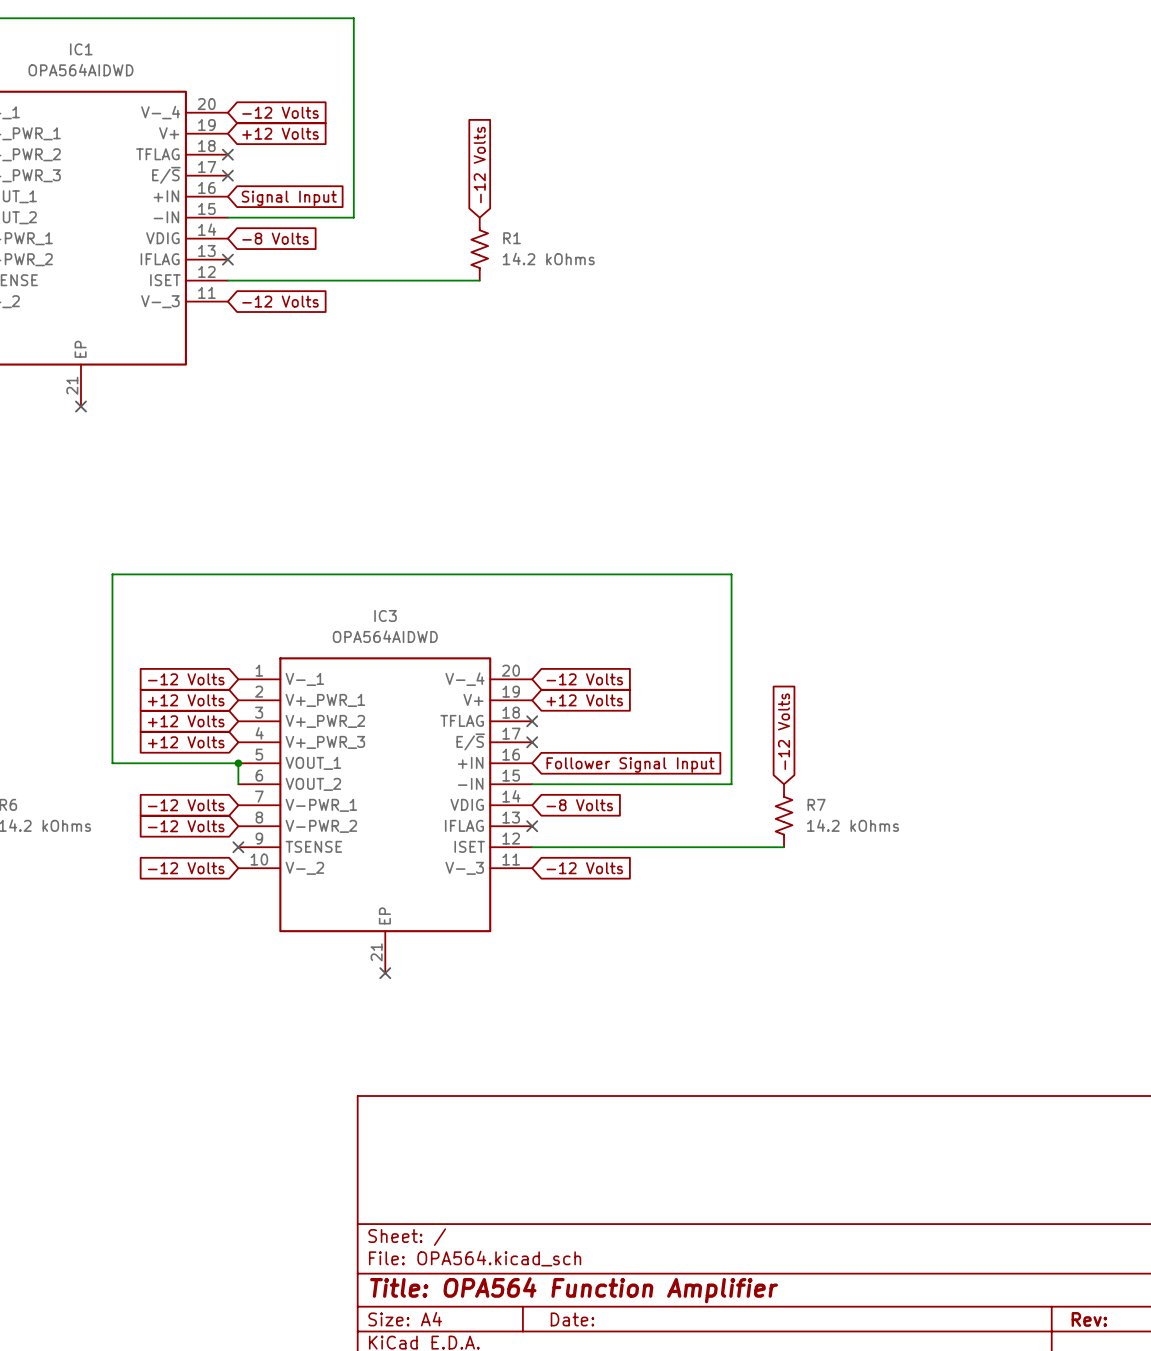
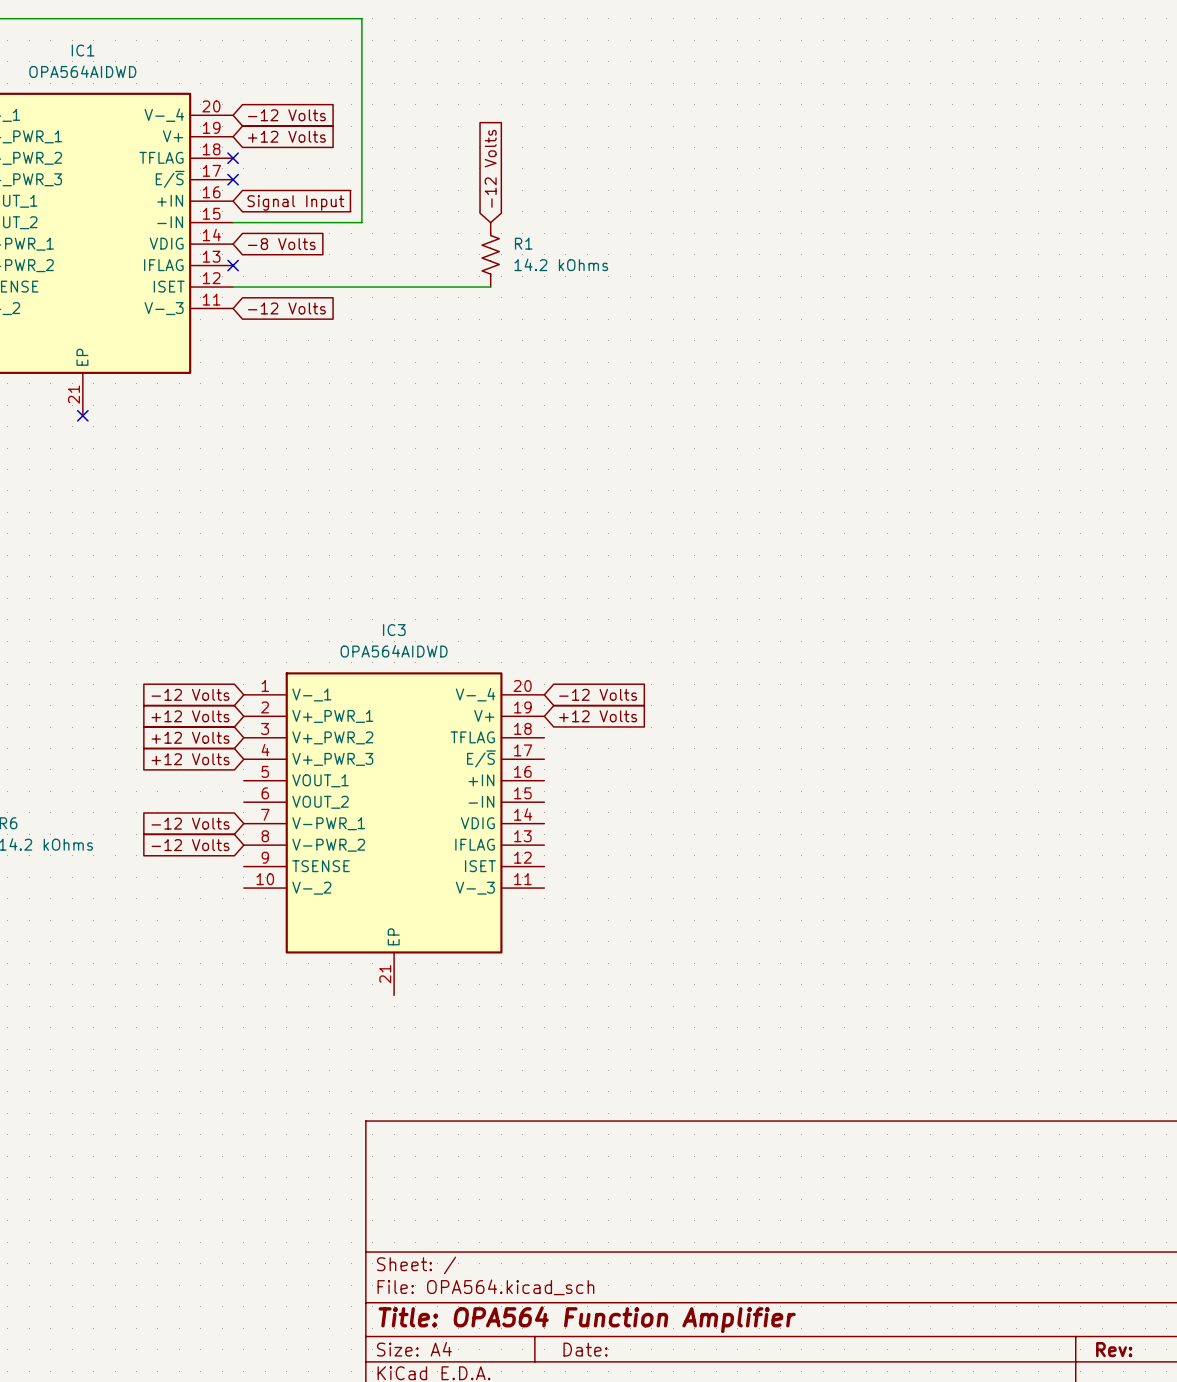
no-connect mark: (532, 721) -> none
global label: -12 Volts (784, 731) -> none
no-connect mark: (532, 742) -> none
junction: (238, 763) -> none
global label: Follower Signal Input (630, 765) -> none
wire: (238, 784) (238, 763) (112, 763) (112, 574) (731, 574) (731, 784) (532, 784) -> none
global label: -8 Volts (579, 805) -> none
R7: 14.2 kOhms (784, 815) -> none
no-connect mark: (532, 826) -> none
no-connect mark: (238, 847) -> none
wire: (532, 847) (784, 847) -> none
global label: -12 Volts (186, 868) -> none
global label: -12 Volts (584, 868) -> none
no-connect mark: (385, 973) -> none

